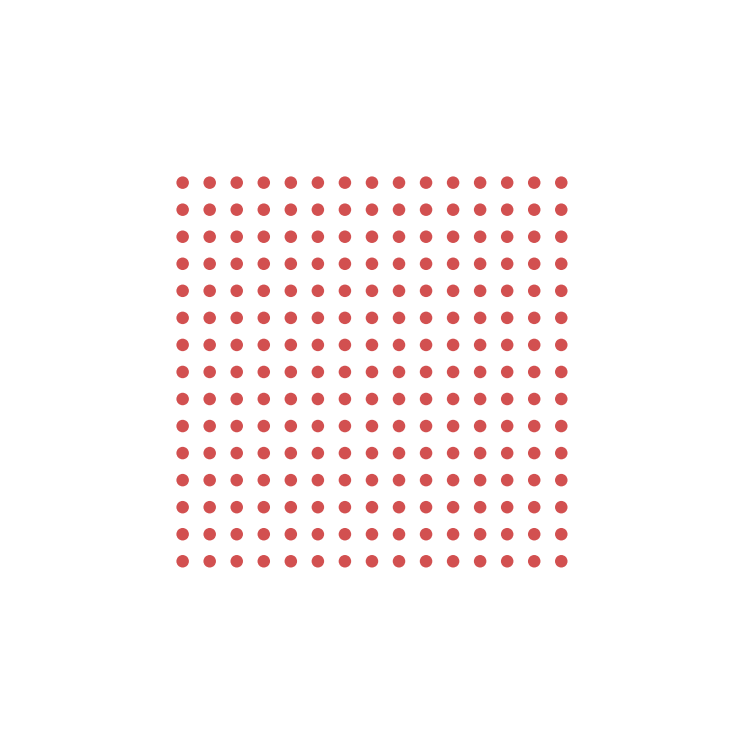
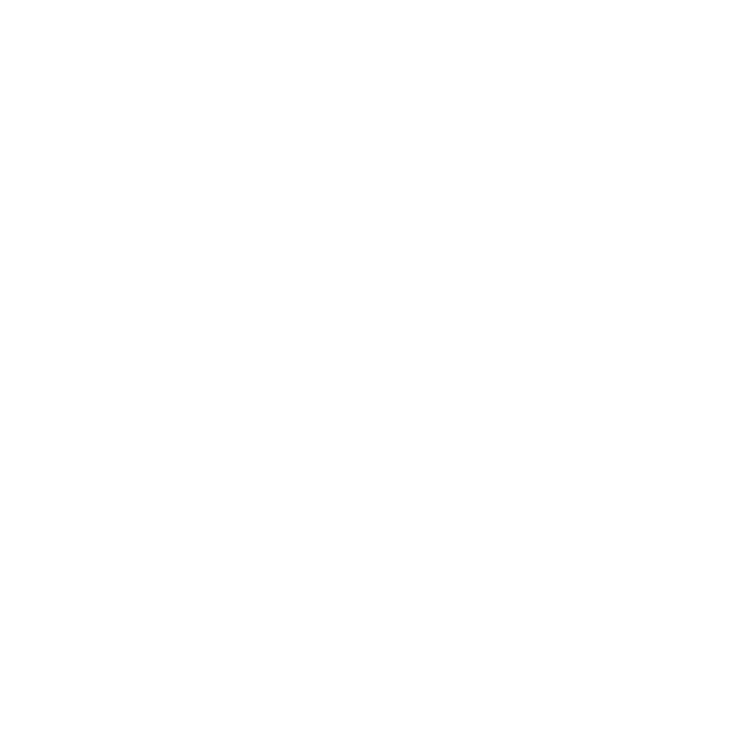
part: (371, 371) -> none

